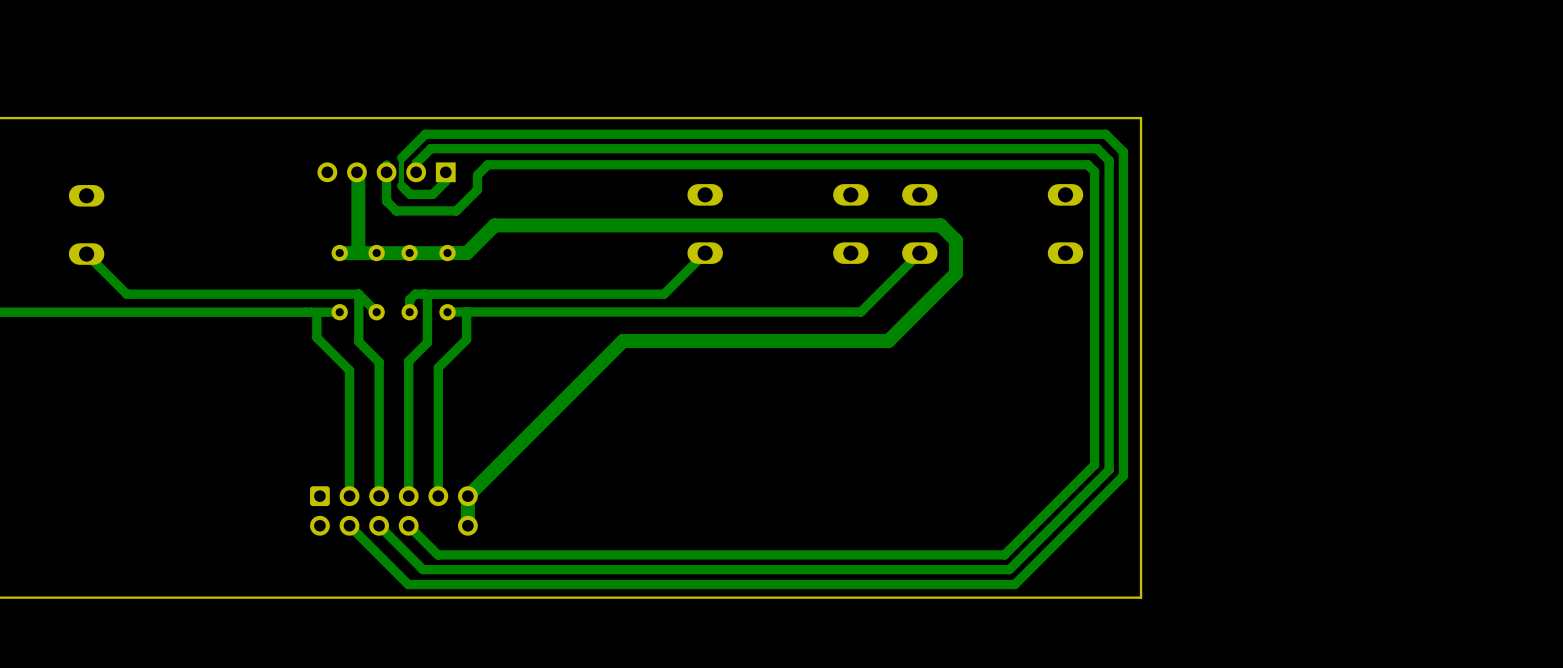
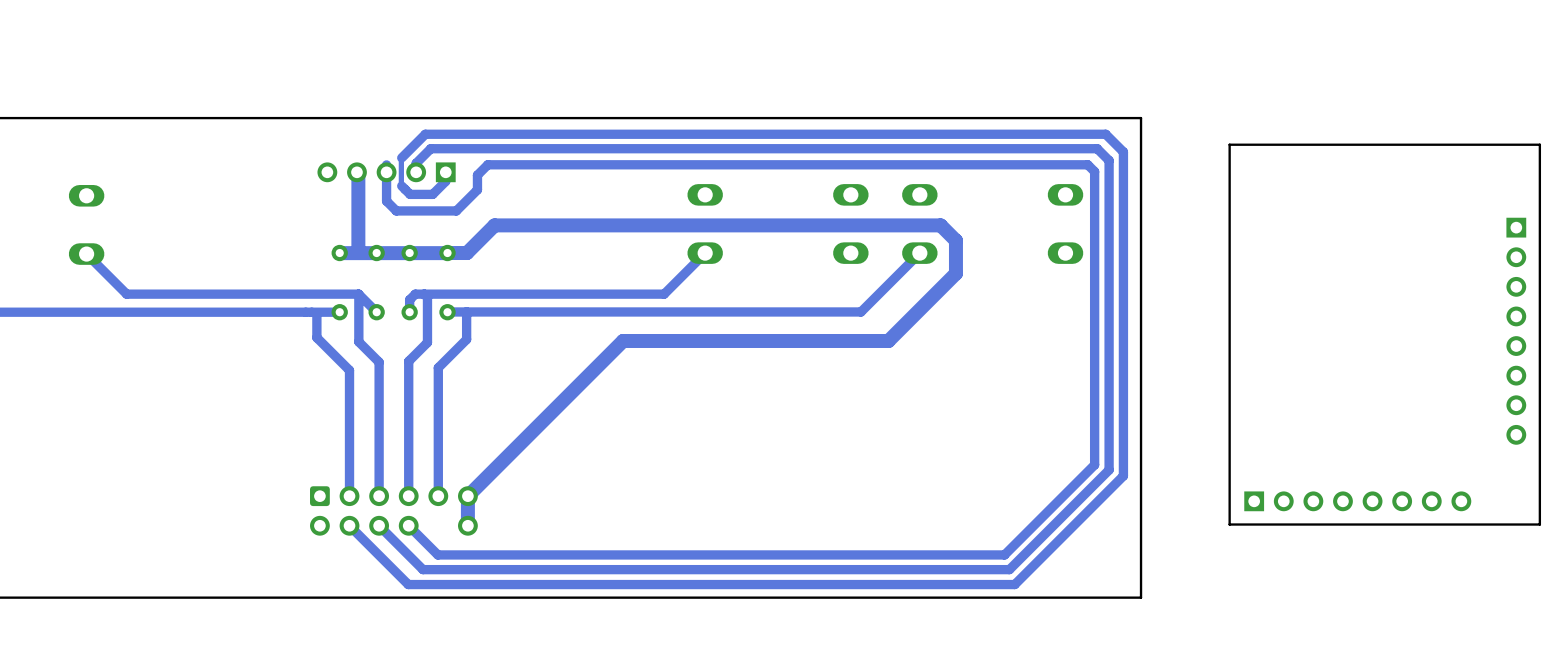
board edge: none -> (1539, 144) (1229, 144) (1229, 524) (1539, 524) (1539, 144)
part: none -> (1516, 331)
part: none -> (1357, 501)

